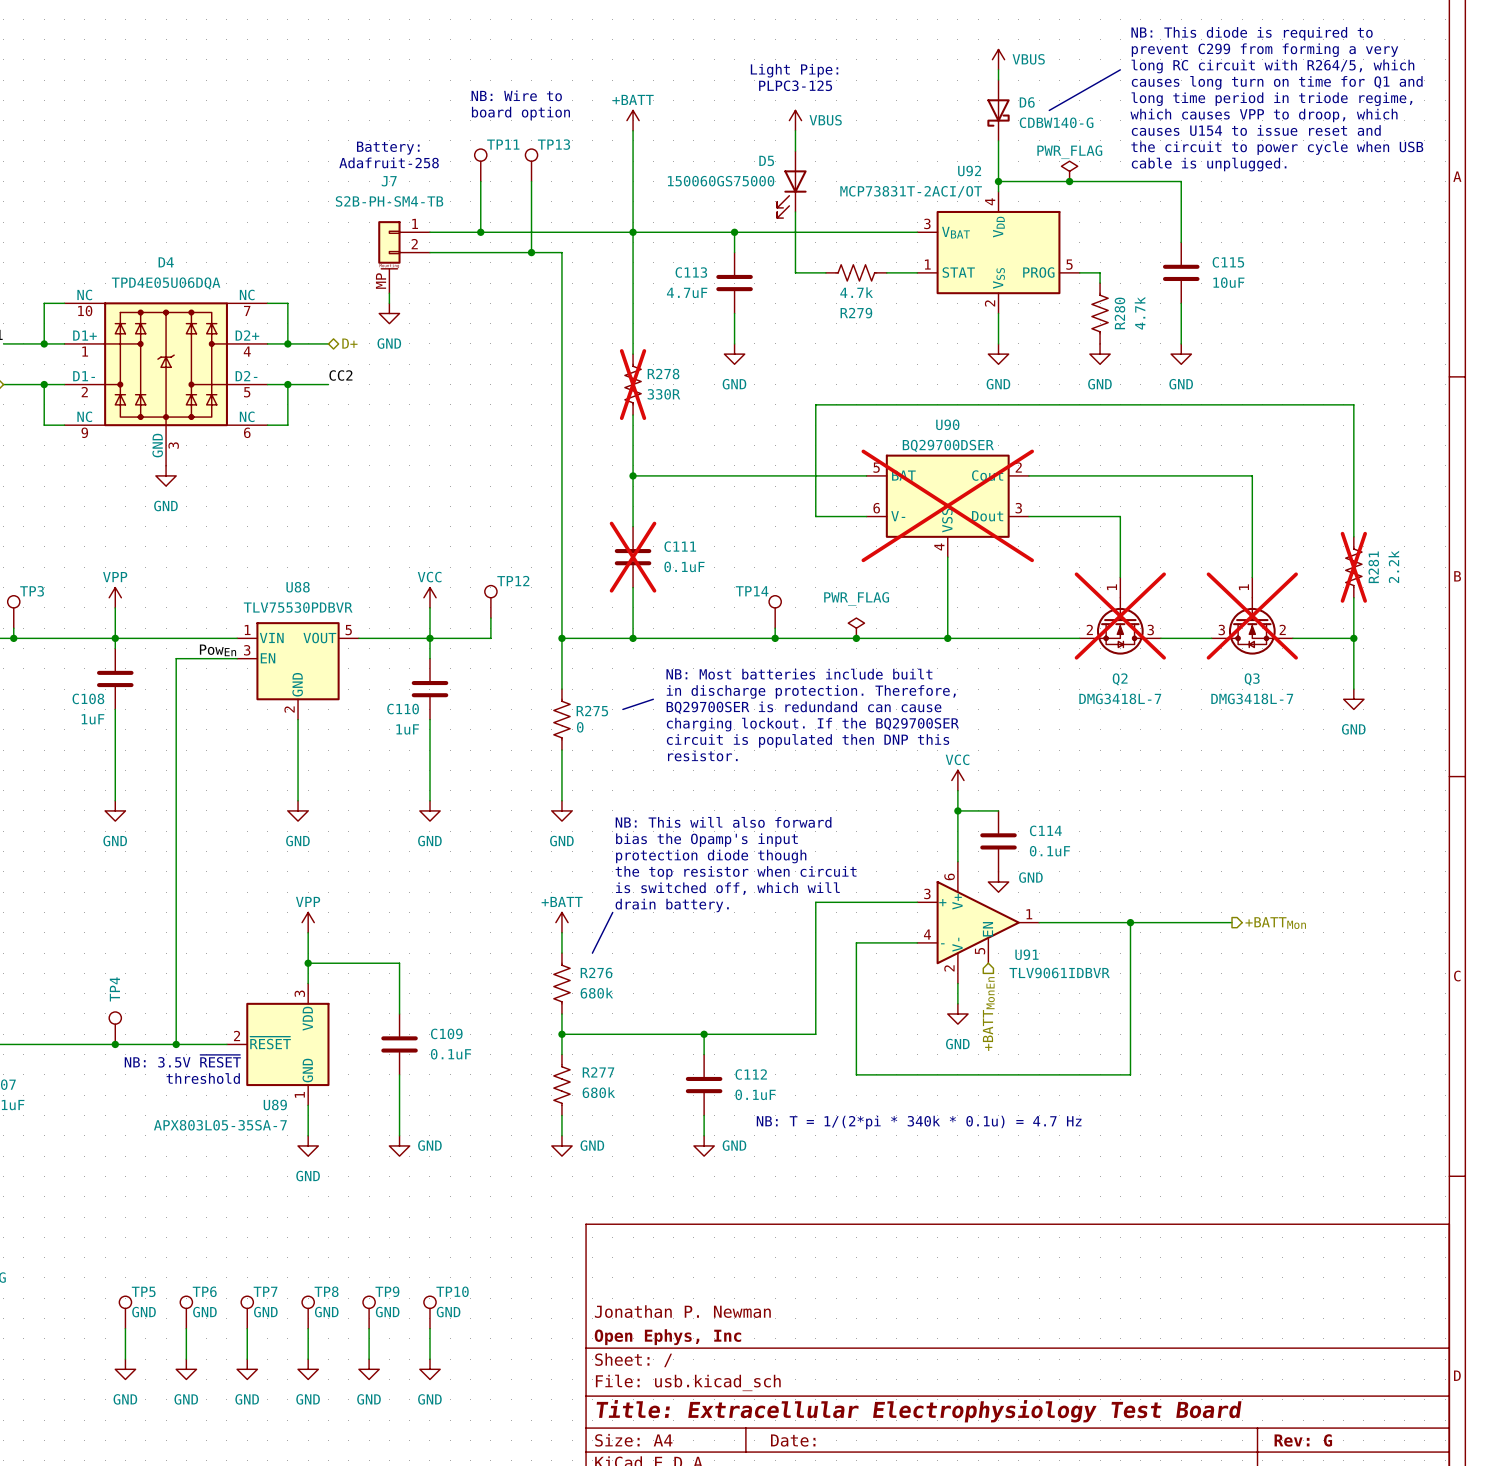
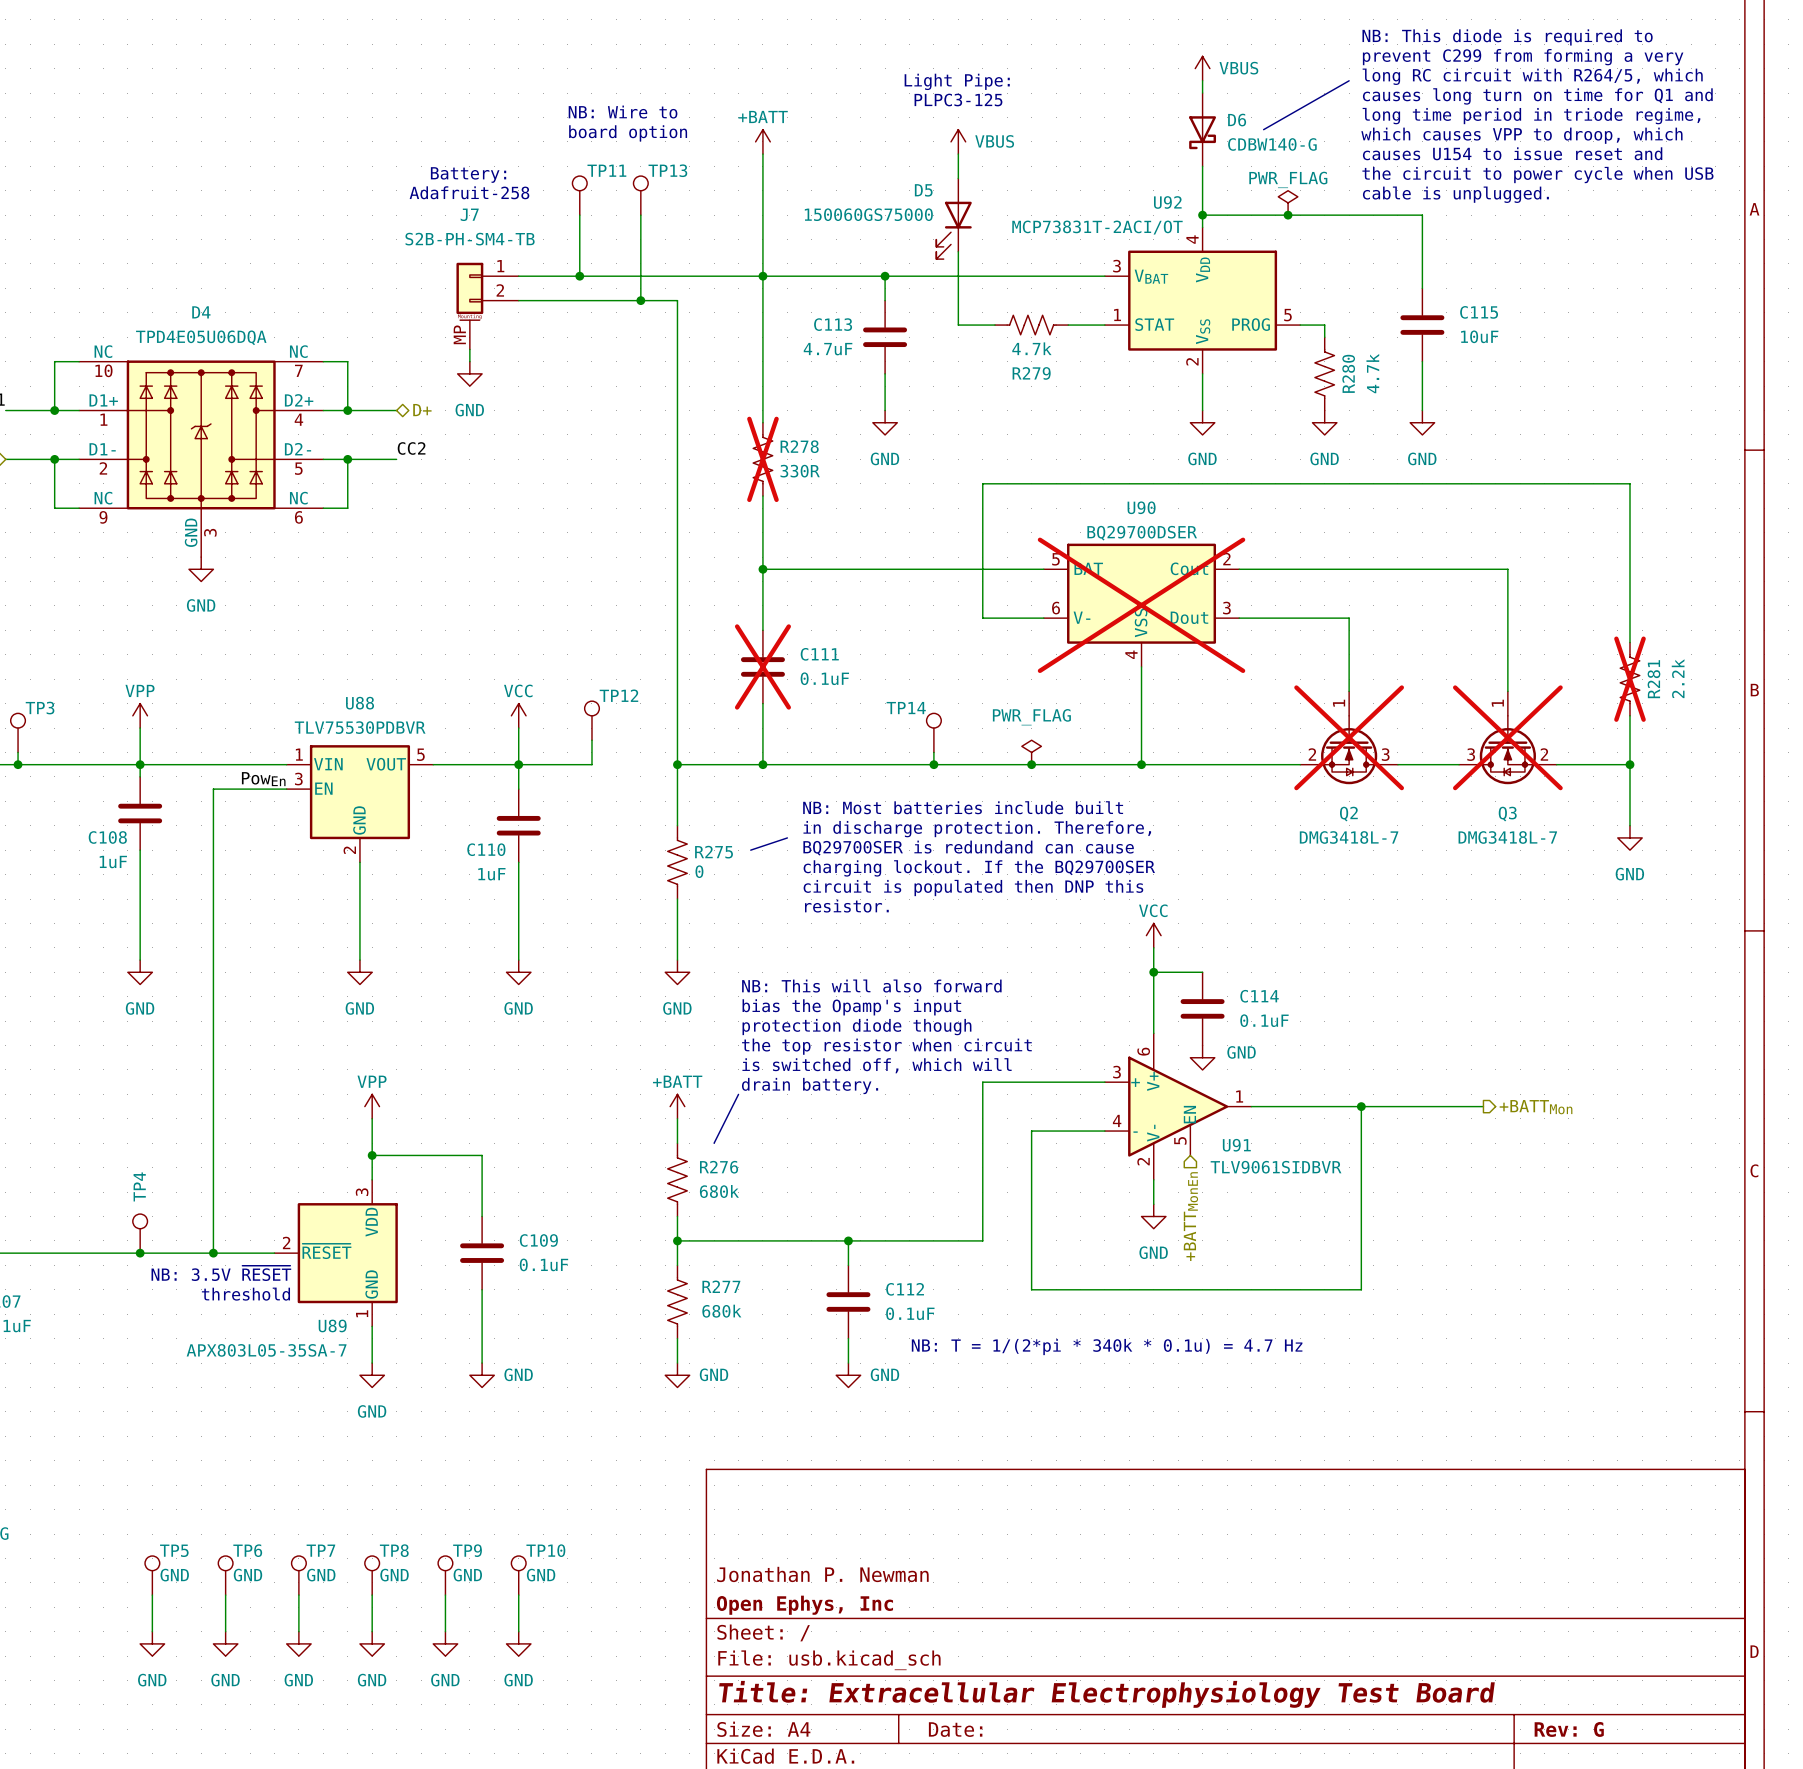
U91 value: TLV9061IDBVR (1059, 973) -> TLV9061SIDBVR (1276, 1167)

